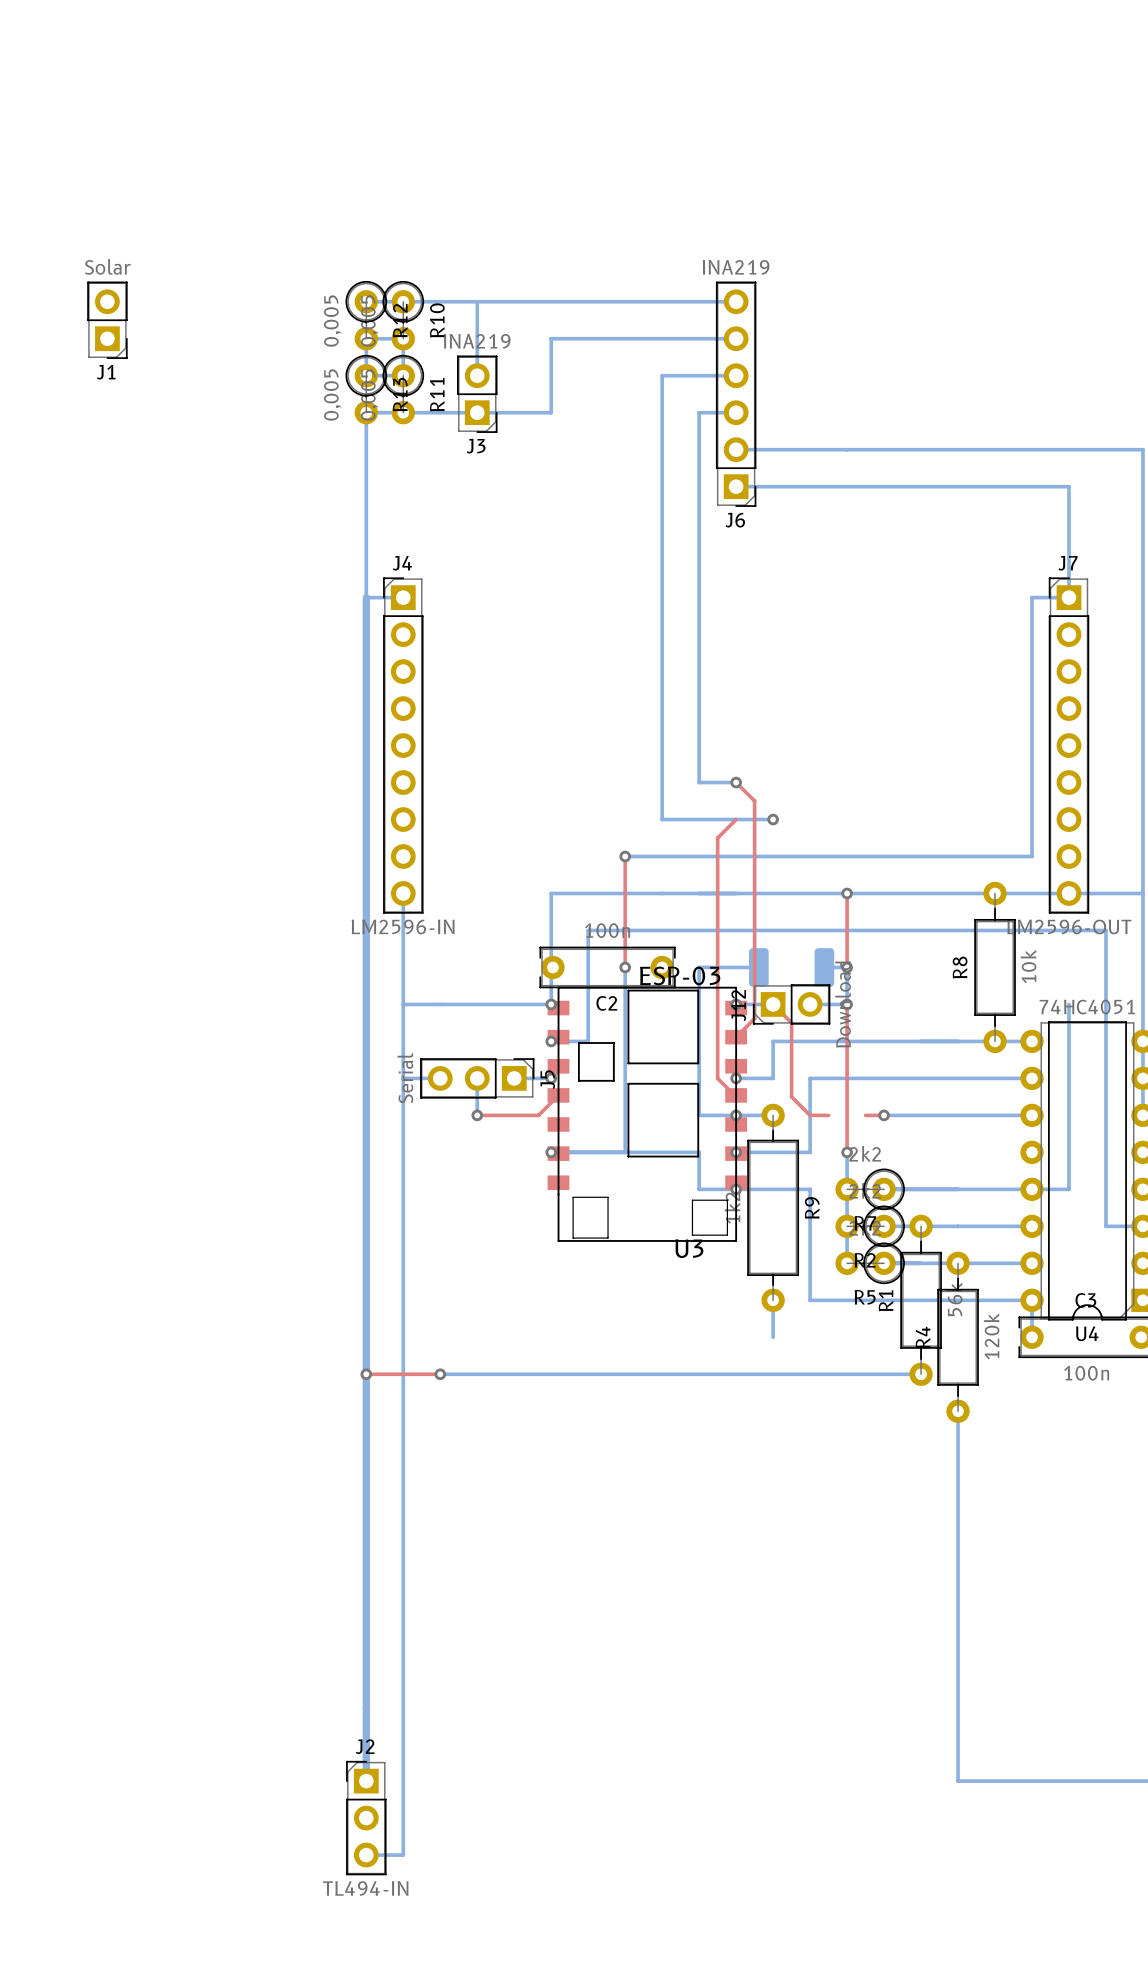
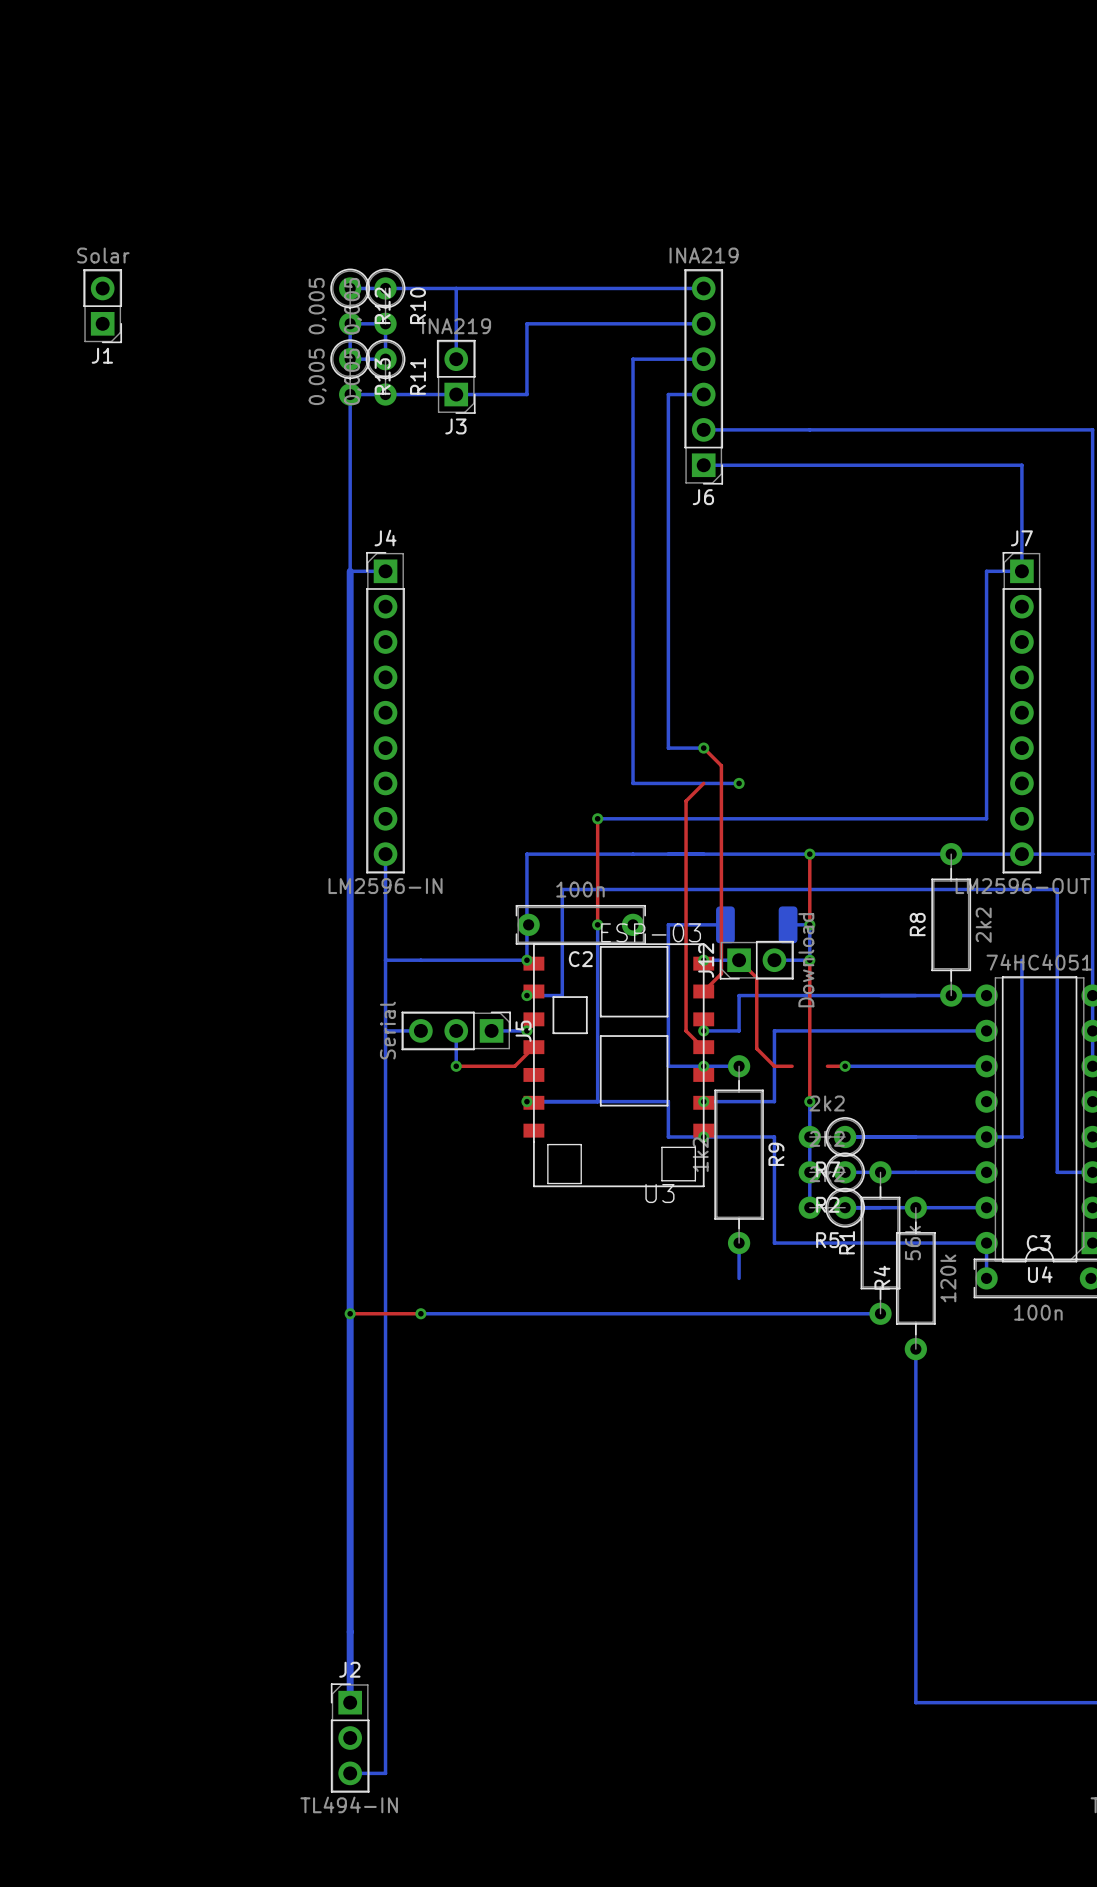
R8 value: 10k (1028, 966) -> 2k2 (983, 925)

